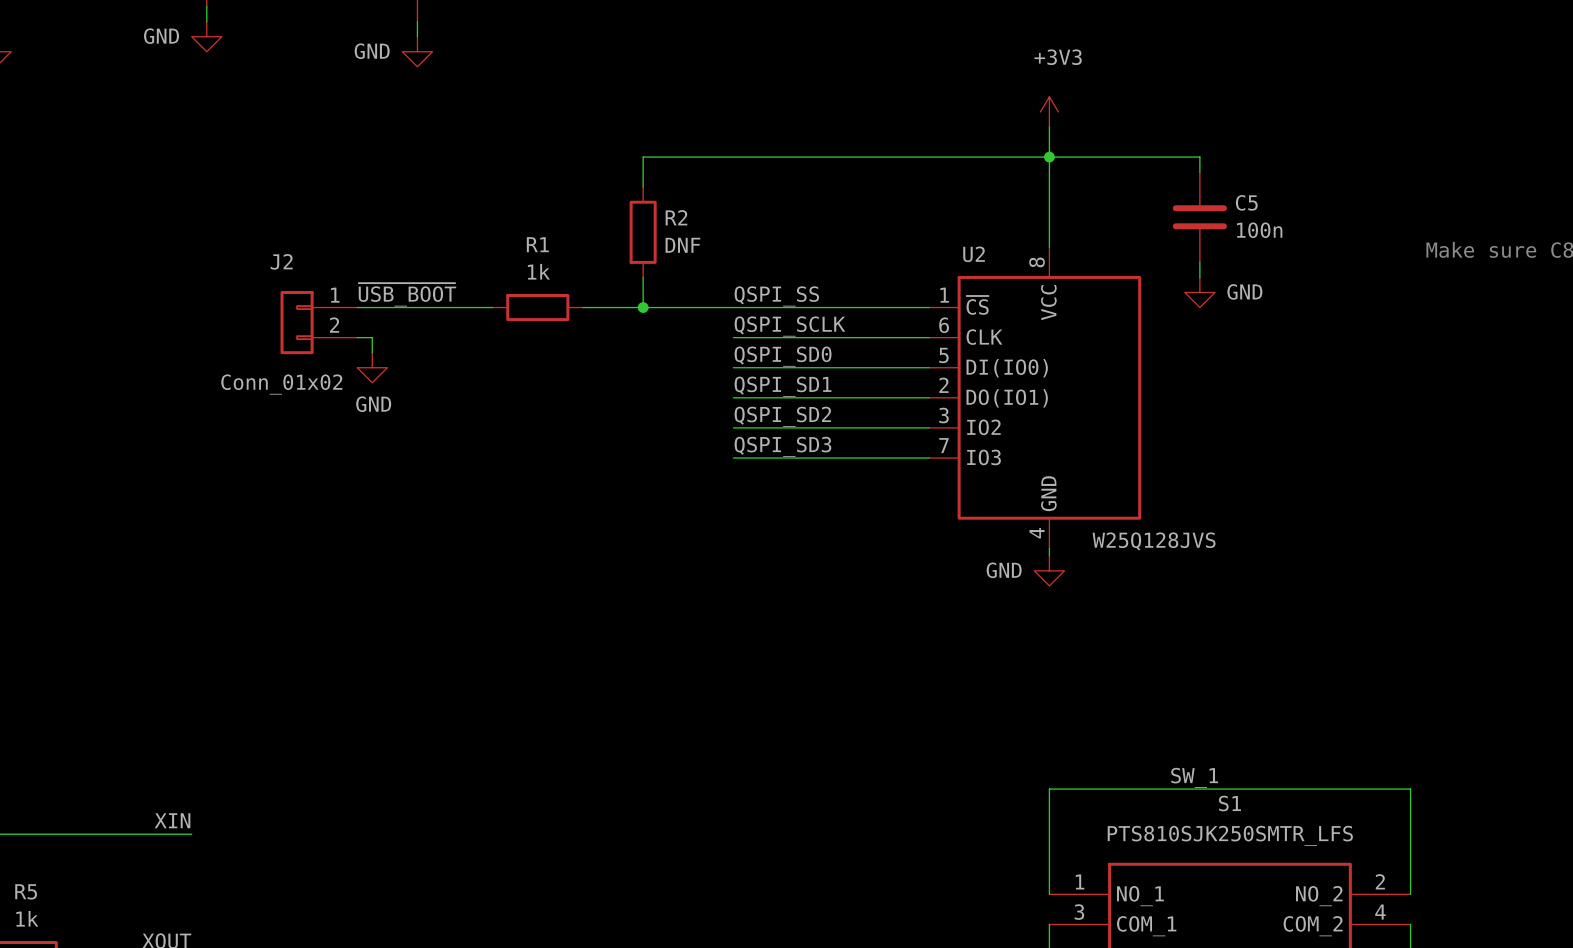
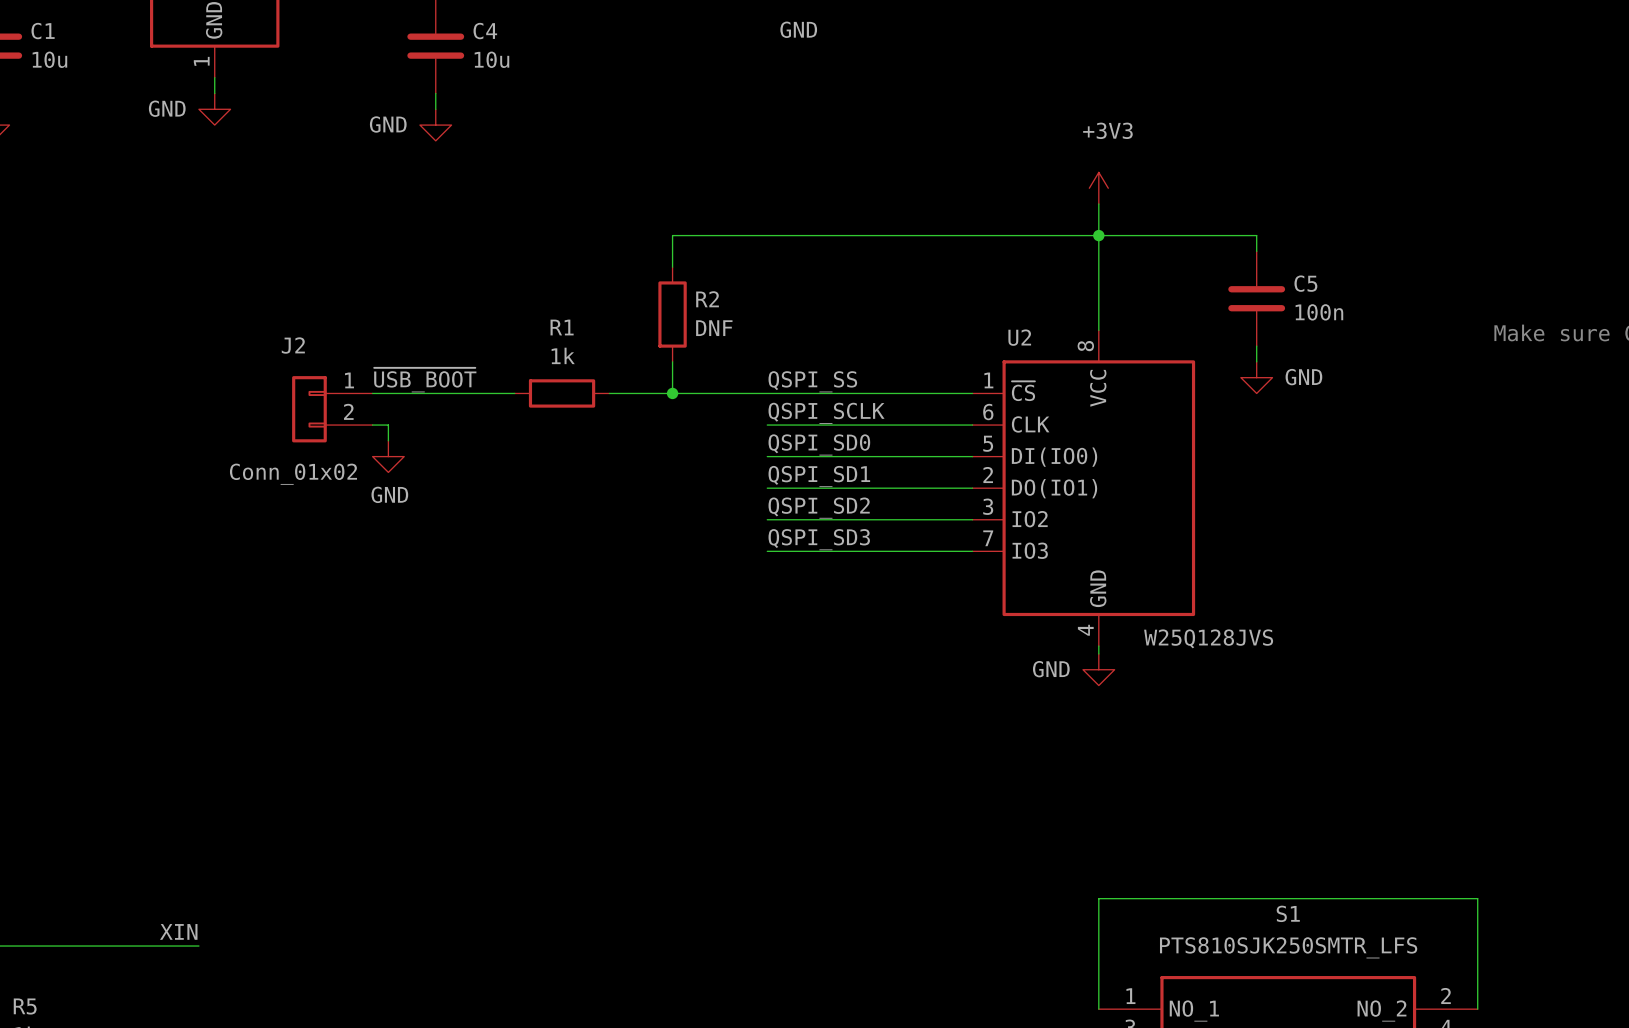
label: SW_1 (1194, 777) -> none

